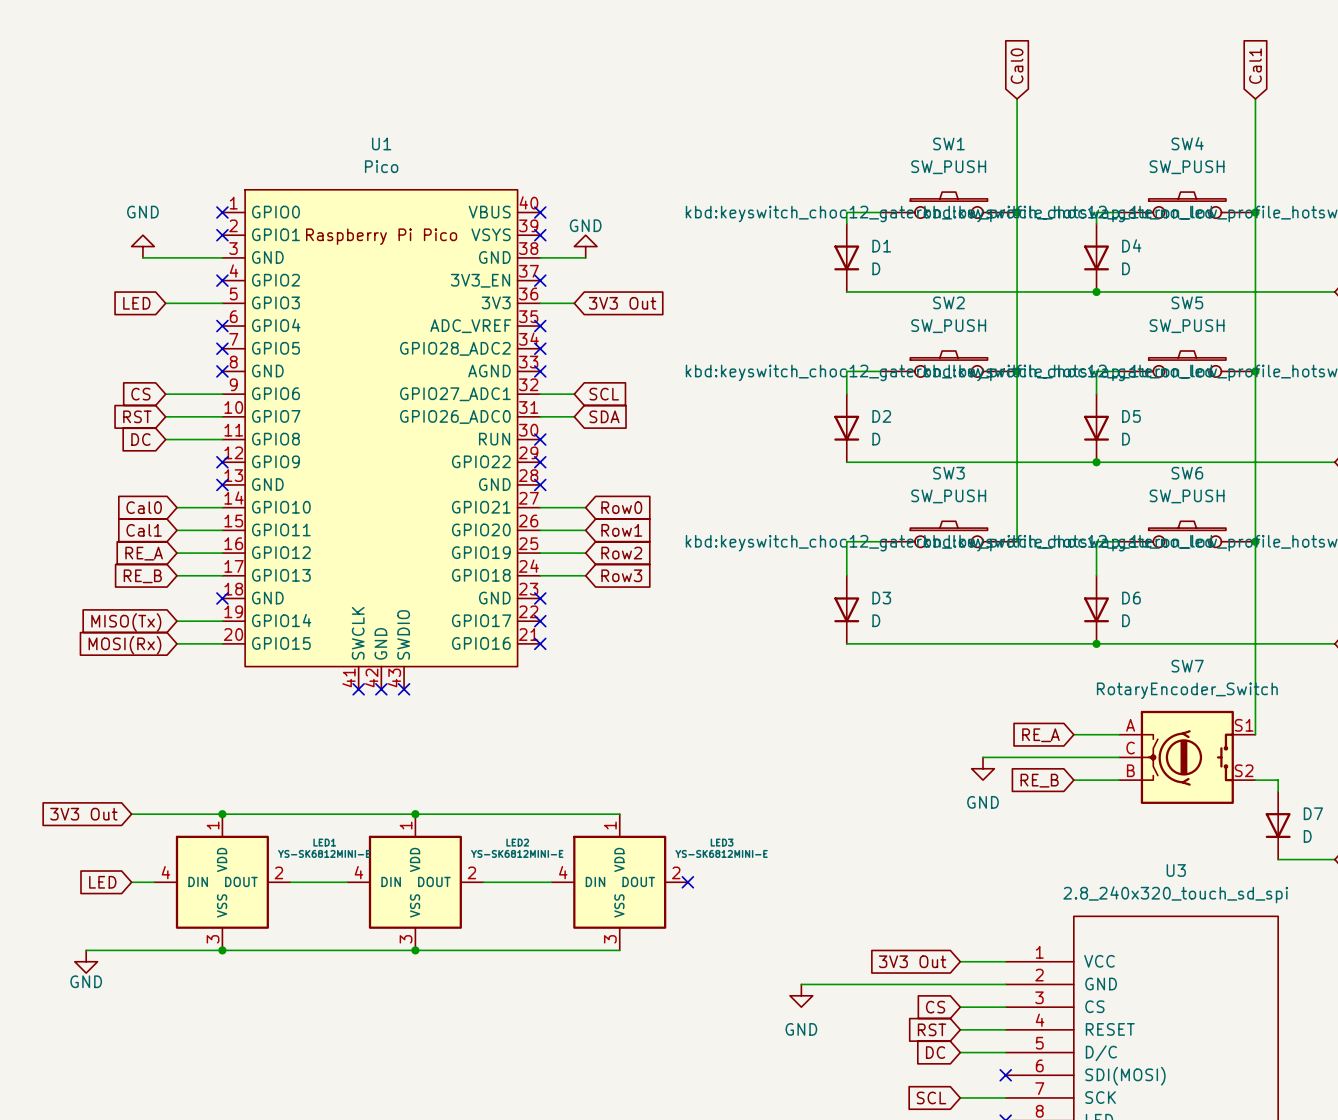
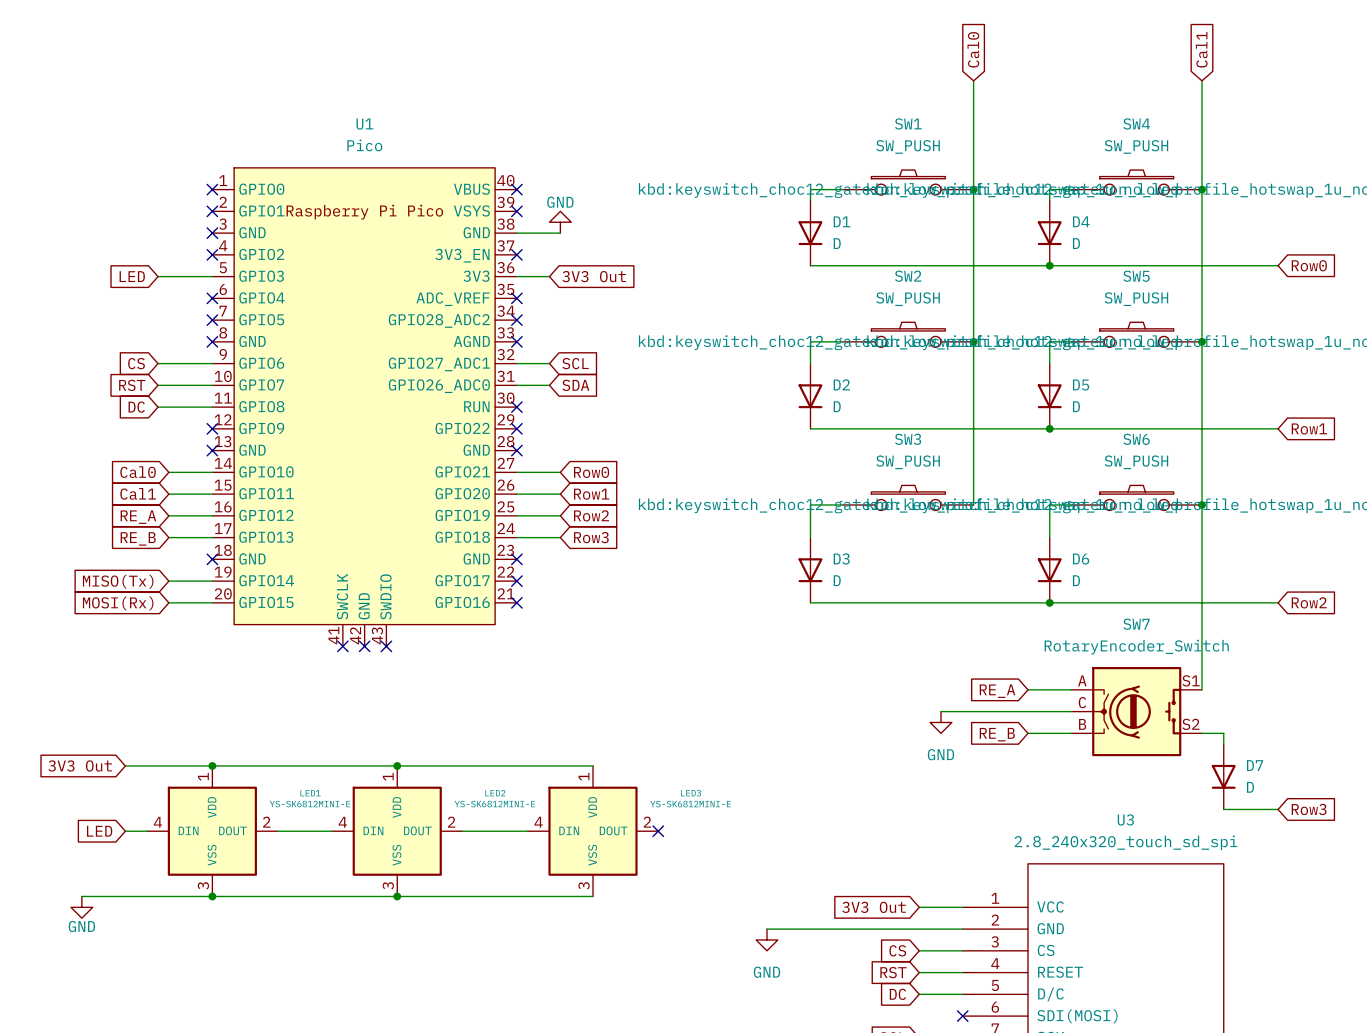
power symbol: GND (142, 246) -> none
wire: (142, 257) (222, 257) -> none
no-connect mark: none -> (212, 233)

